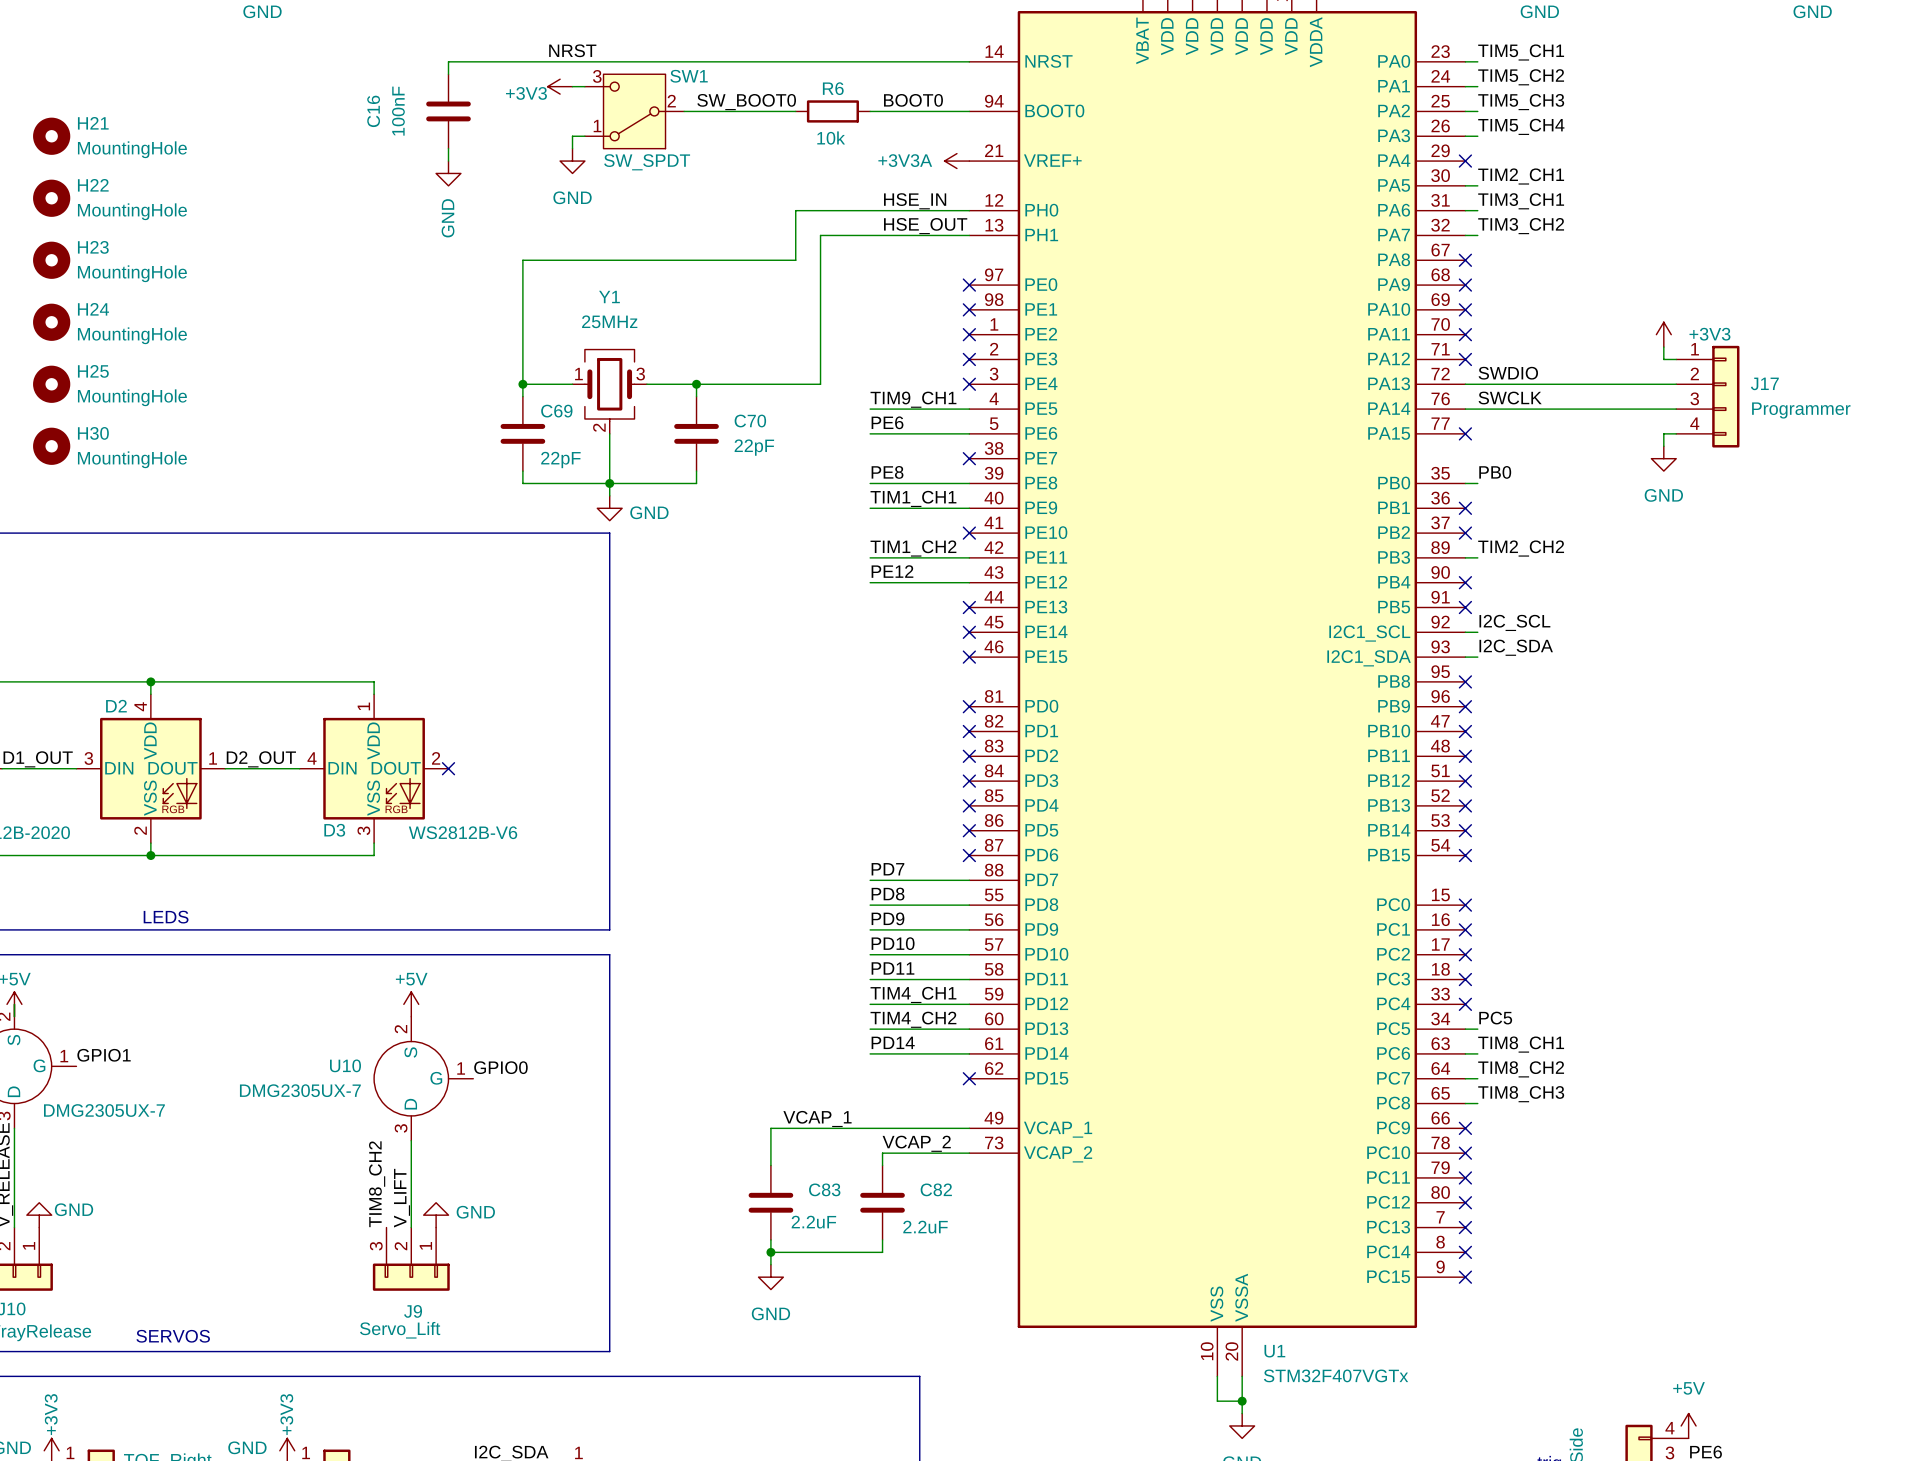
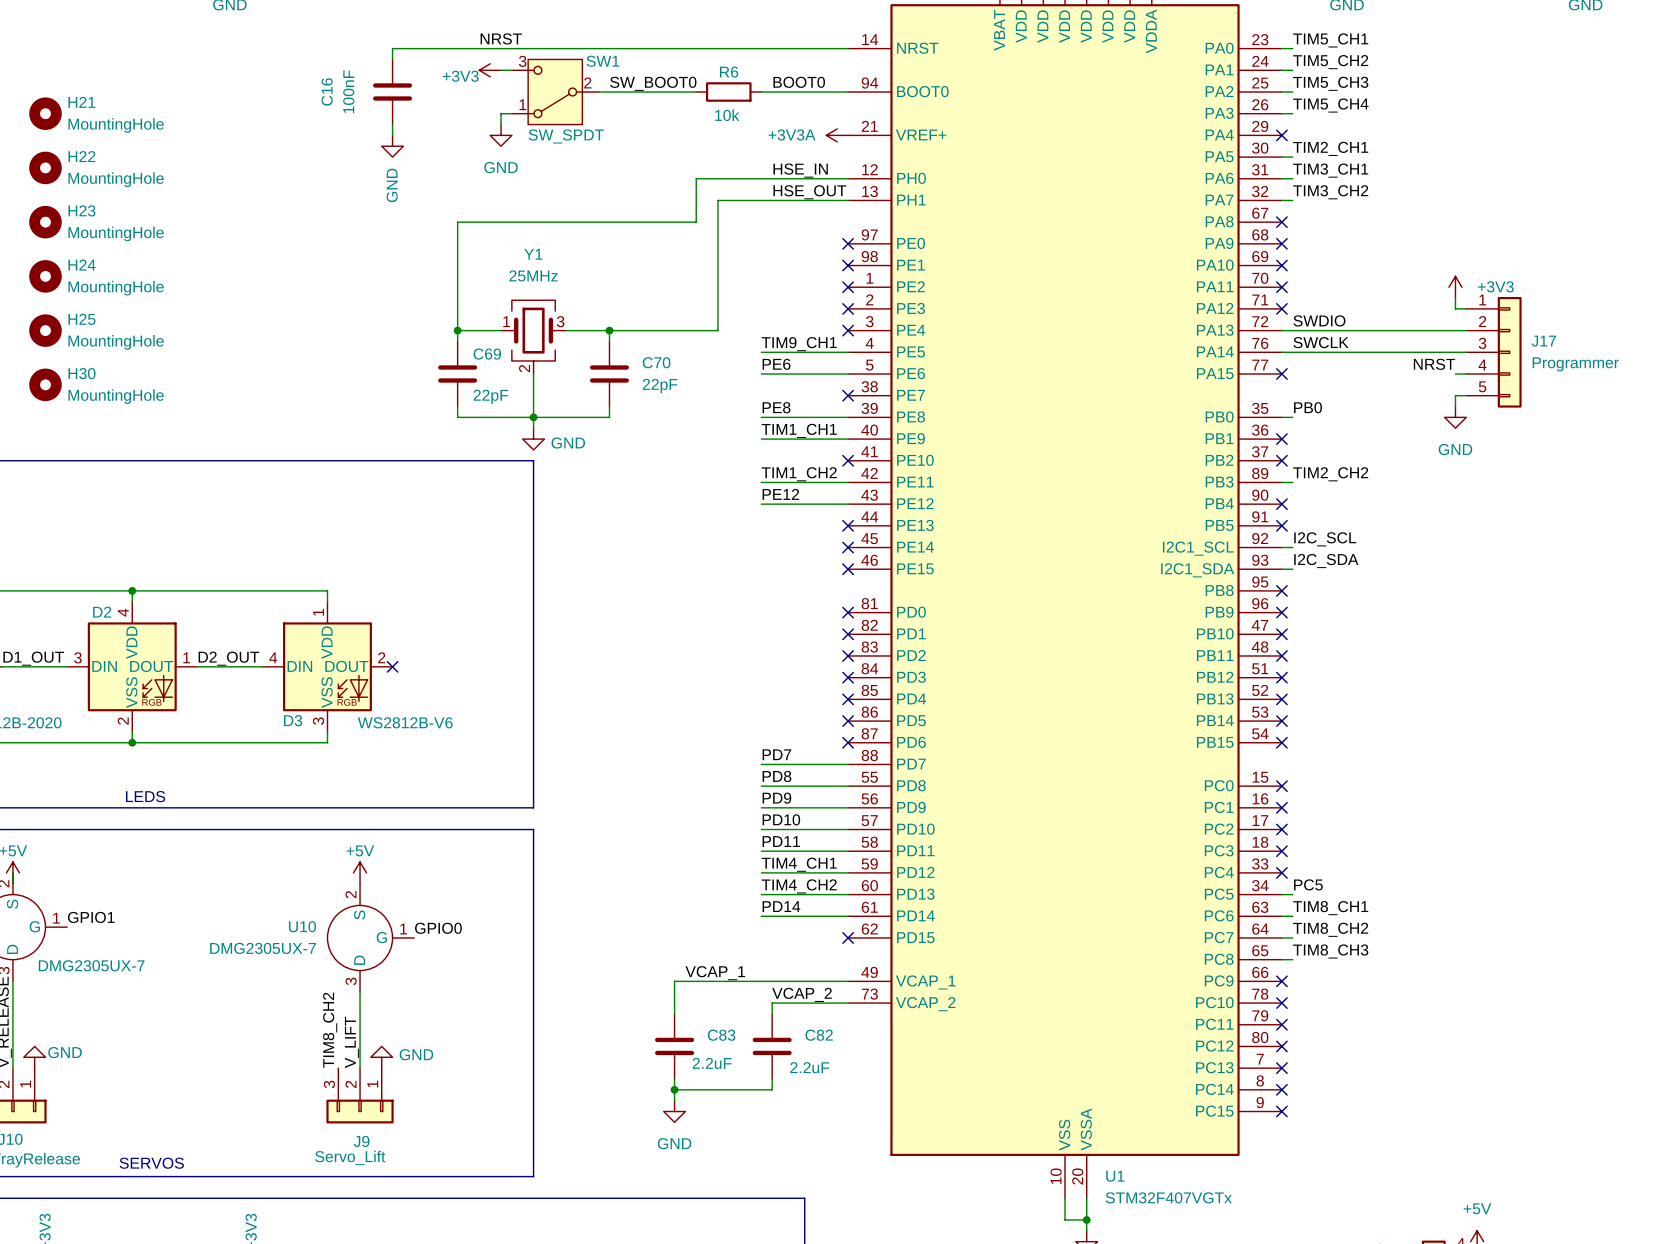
J17 symbol: [1676, 345, 1740, 448] -> [1466, 296, 1522, 408]
label: none -> NRST (1434, 364)
wire: (1663, 433) (1663, 446) -> none
power symbol position: GND (1663, 458) -> GND (1455, 417)

